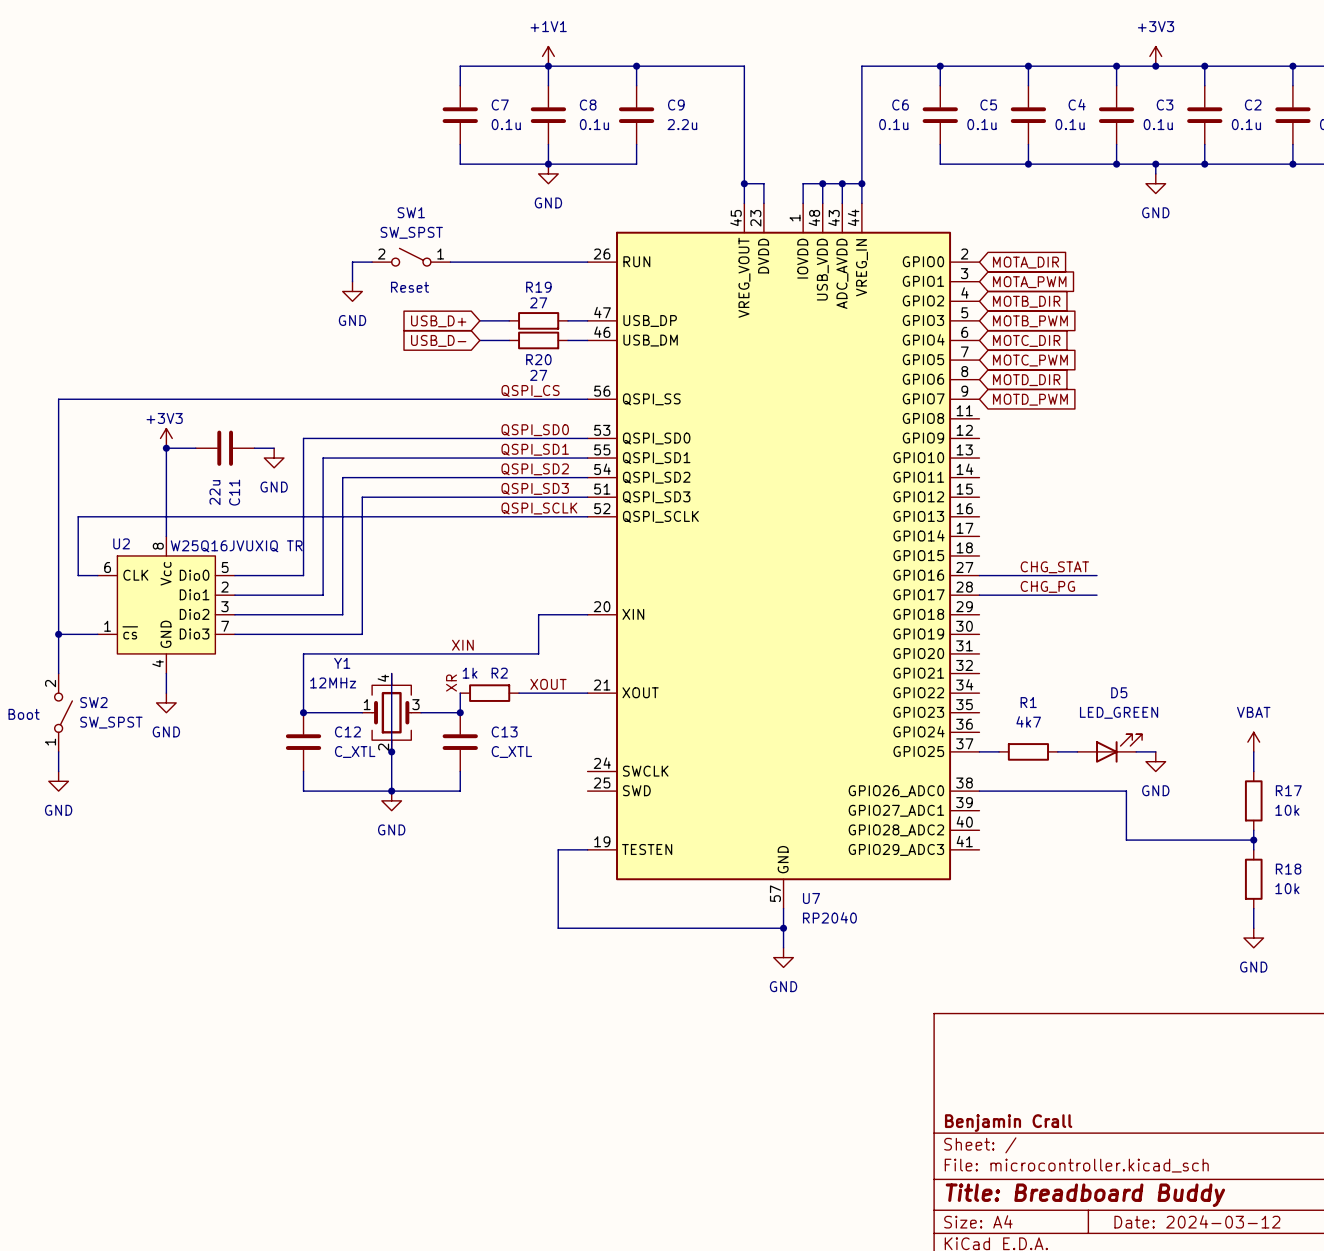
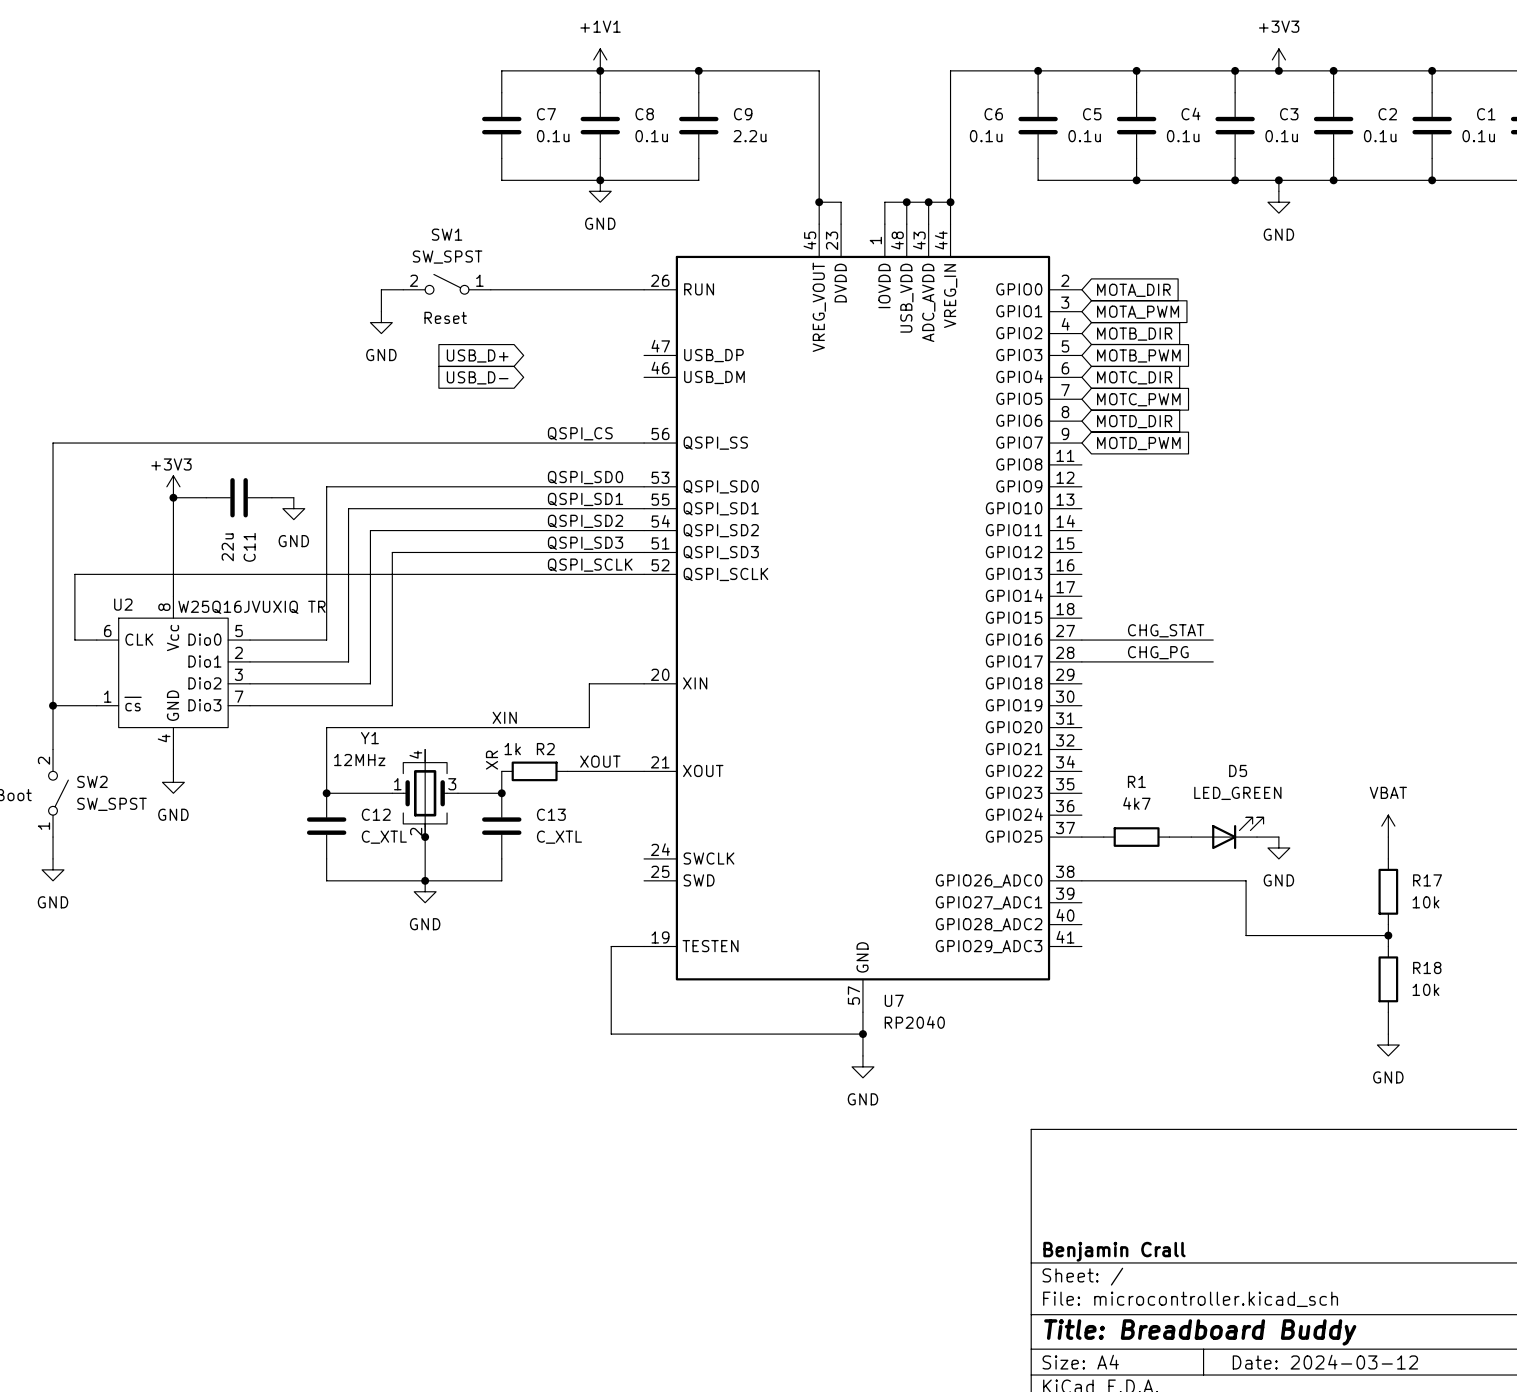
wire: (479, 320) (509, 320) -> none
R19: 27 (538, 320) -> none
wire: (568, 320) (587, 320) -> none
wire: (479, 340) (509, 340) -> none
R20: 27 (538, 340) -> none
wire: (568, 340) (587, 340) -> none

